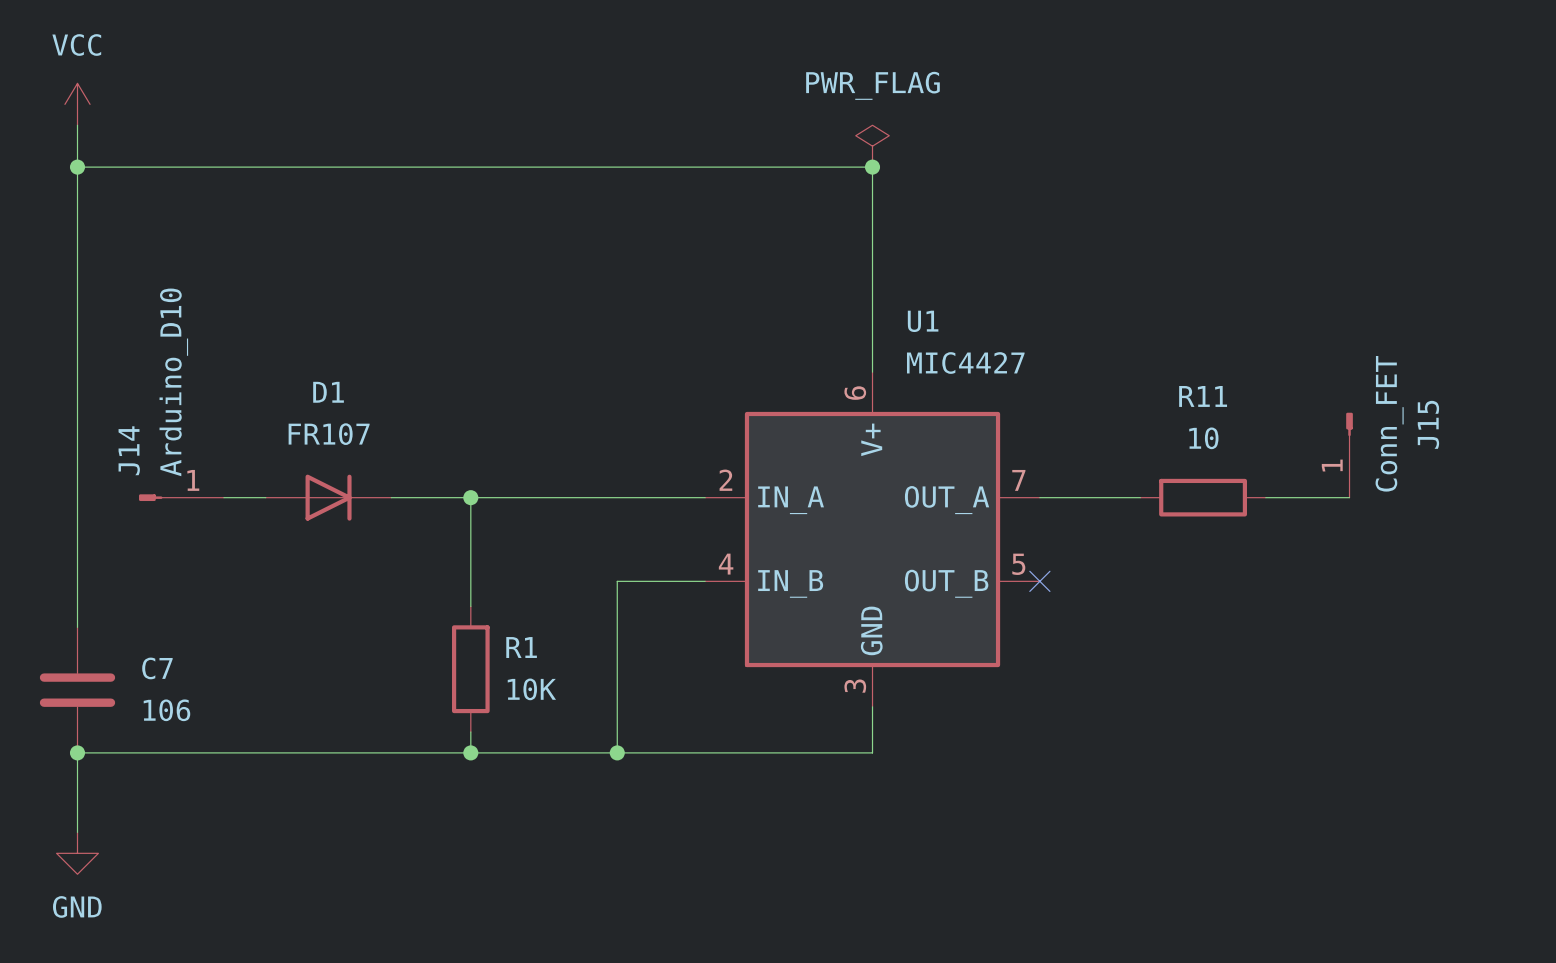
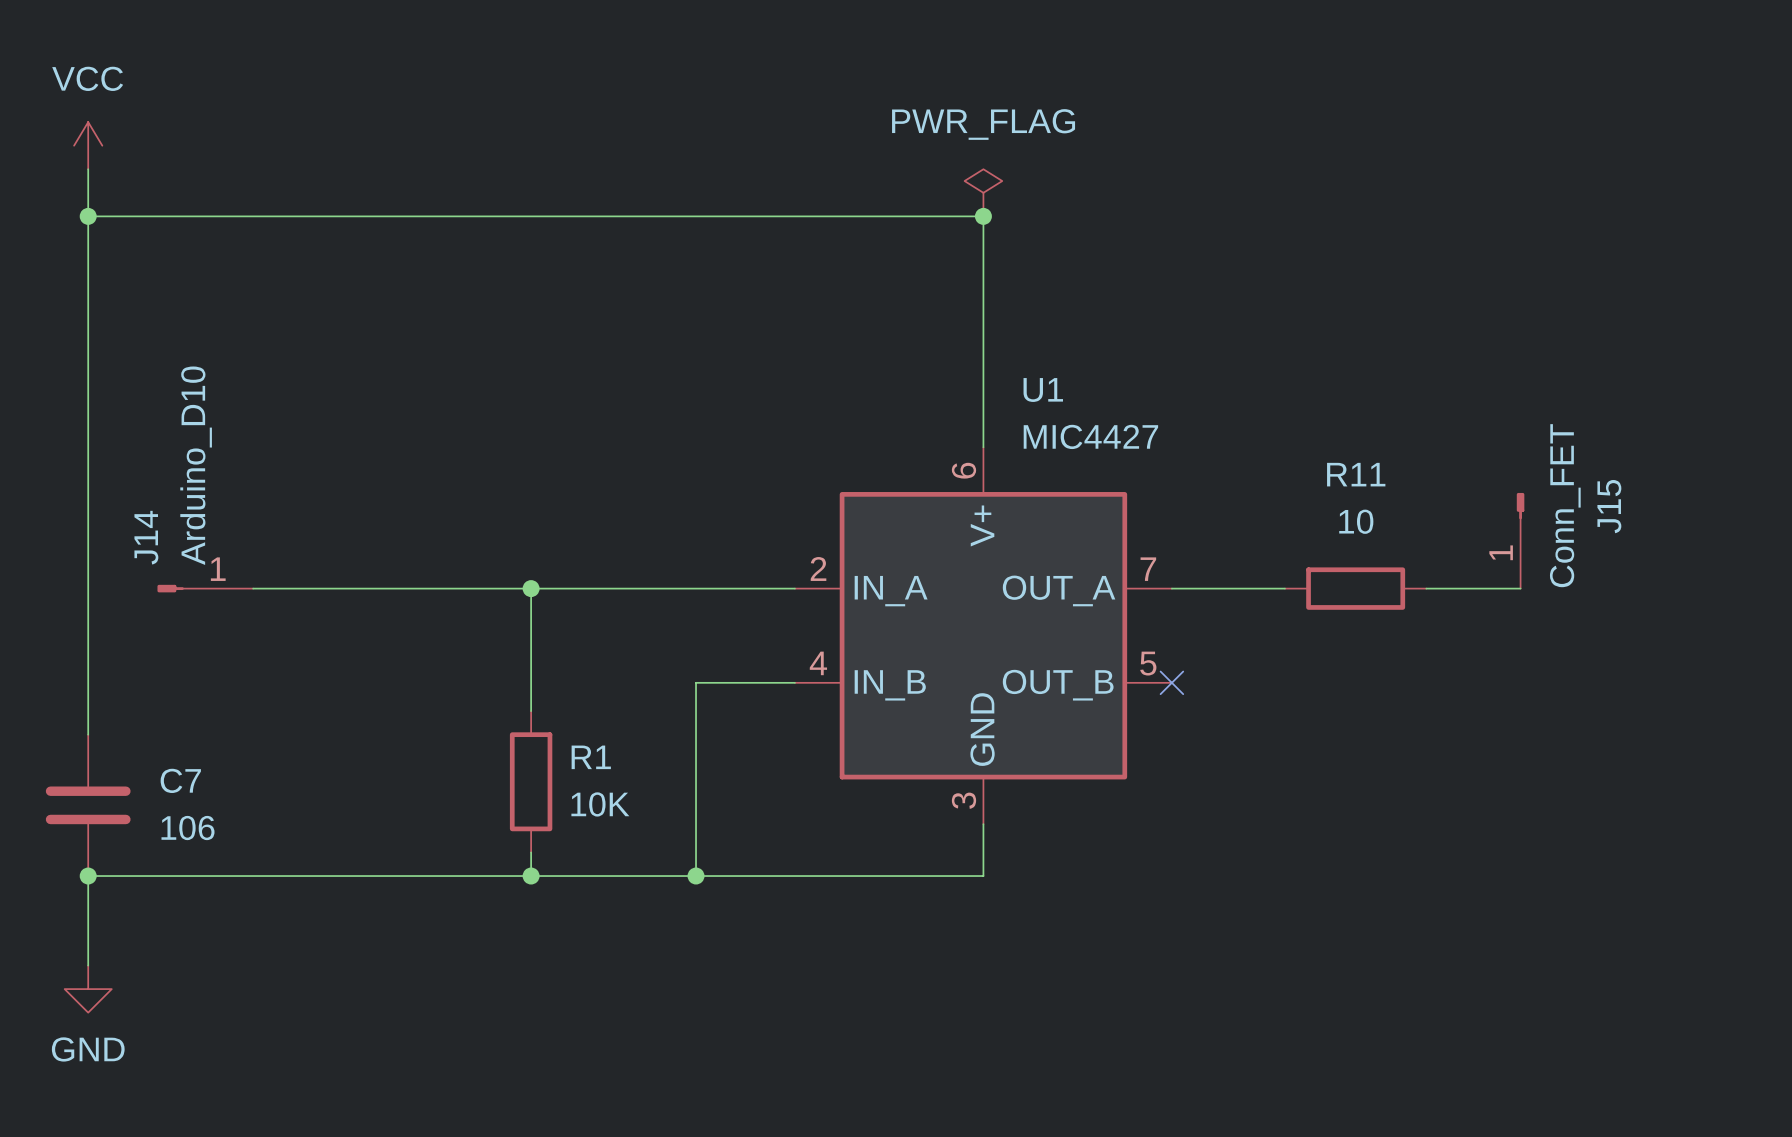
D1: FR107 (328, 497) -> none

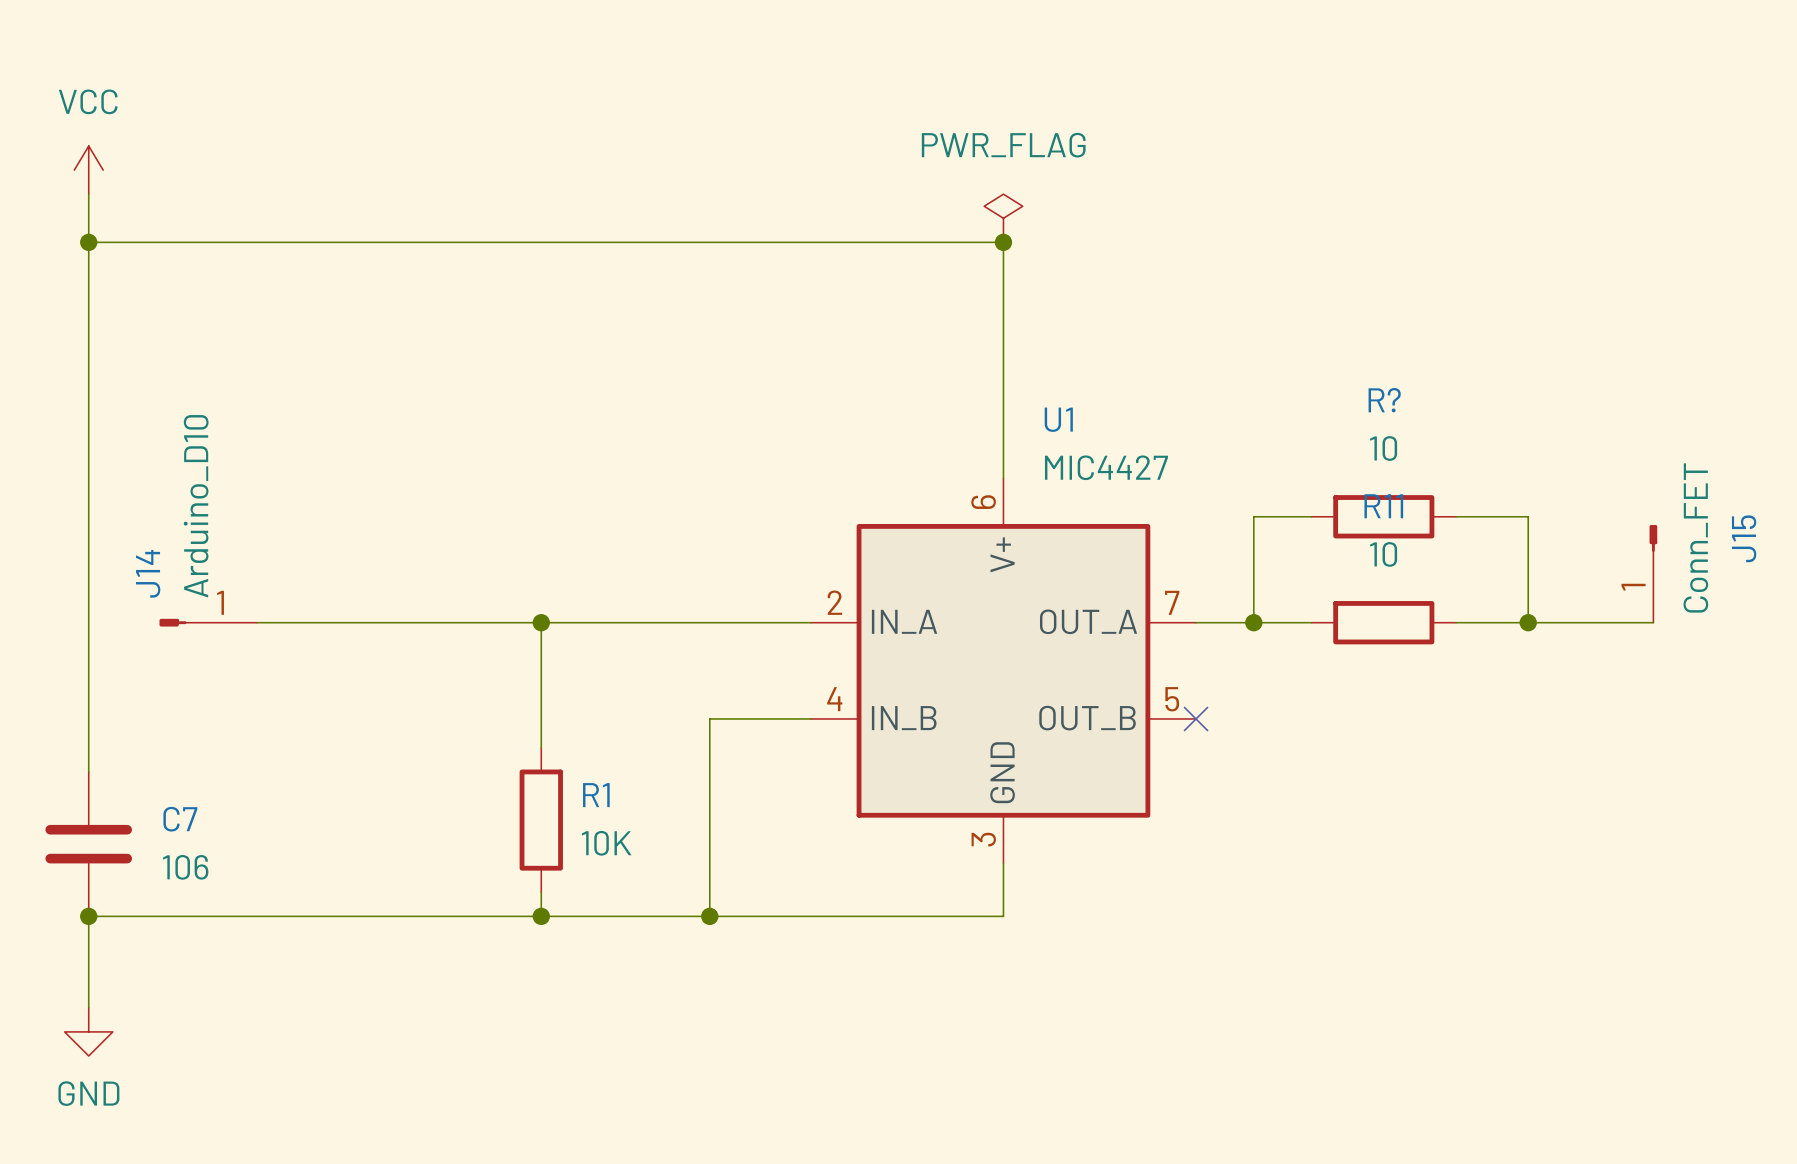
wire: none -> (1311, 516) (1253, 516) (1253, 622)
R?: none -> 10 (1383, 516)
wire: none -> (1456, 516) (1528, 516) (1528, 622)
J15 position: (1520, 540) -> (1653, 573)
junction: none -> (1253, 622)
junction: none -> (1528, 622)
wire: none -> (1552, 622) (1653, 622)

